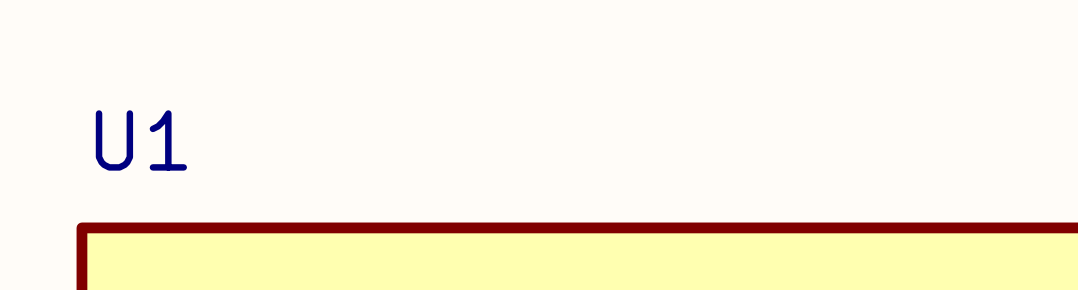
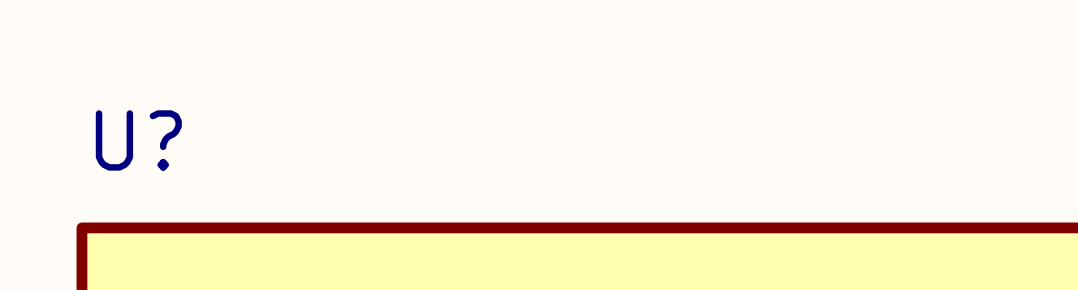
U1 name: U1 (141, 140) -> U? (138, 140)

